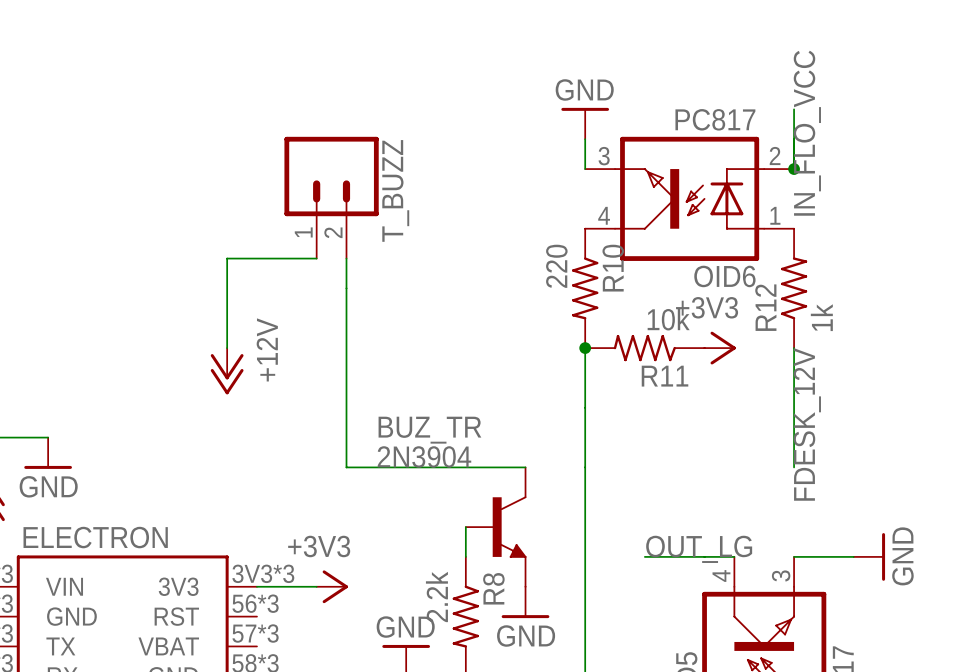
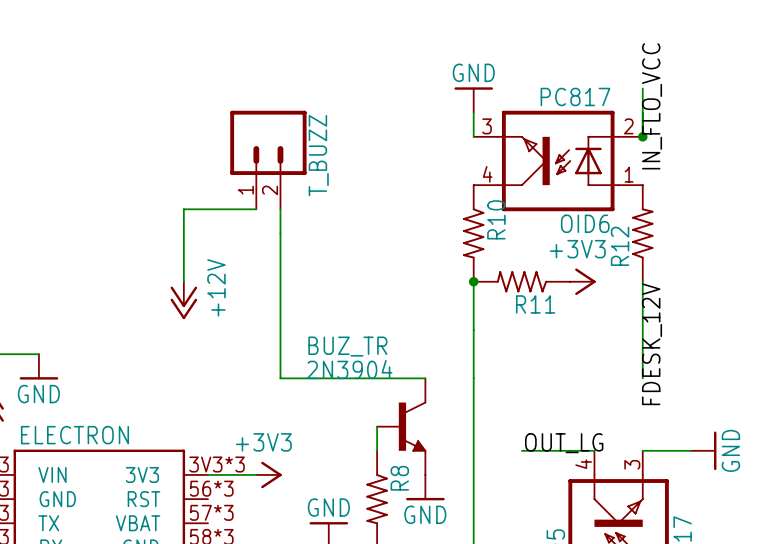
R10 value: 220 (556, 266) -> none
R12 value: 1k (821, 317) -> none
R11 value: 10k (668, 319) -> none
R8 value: 2.2k (436, 596) -> none

